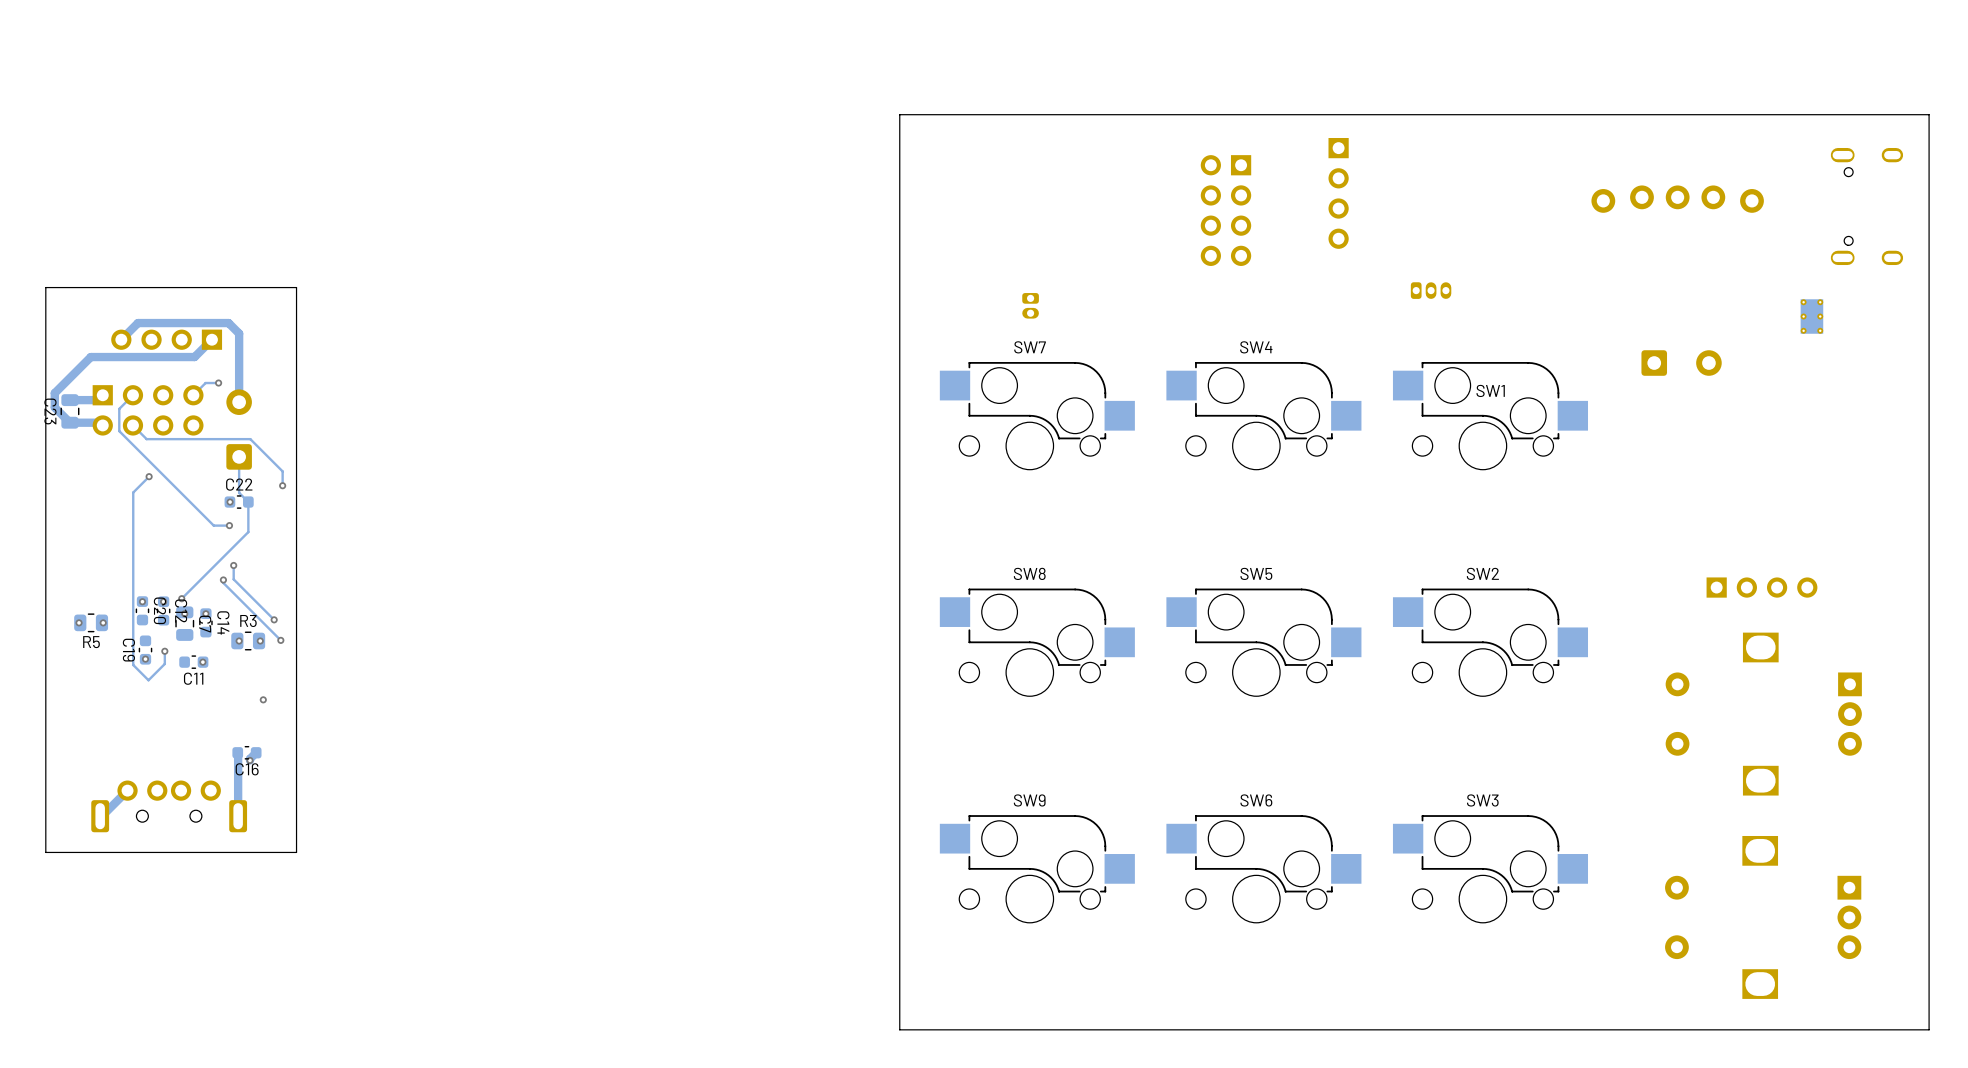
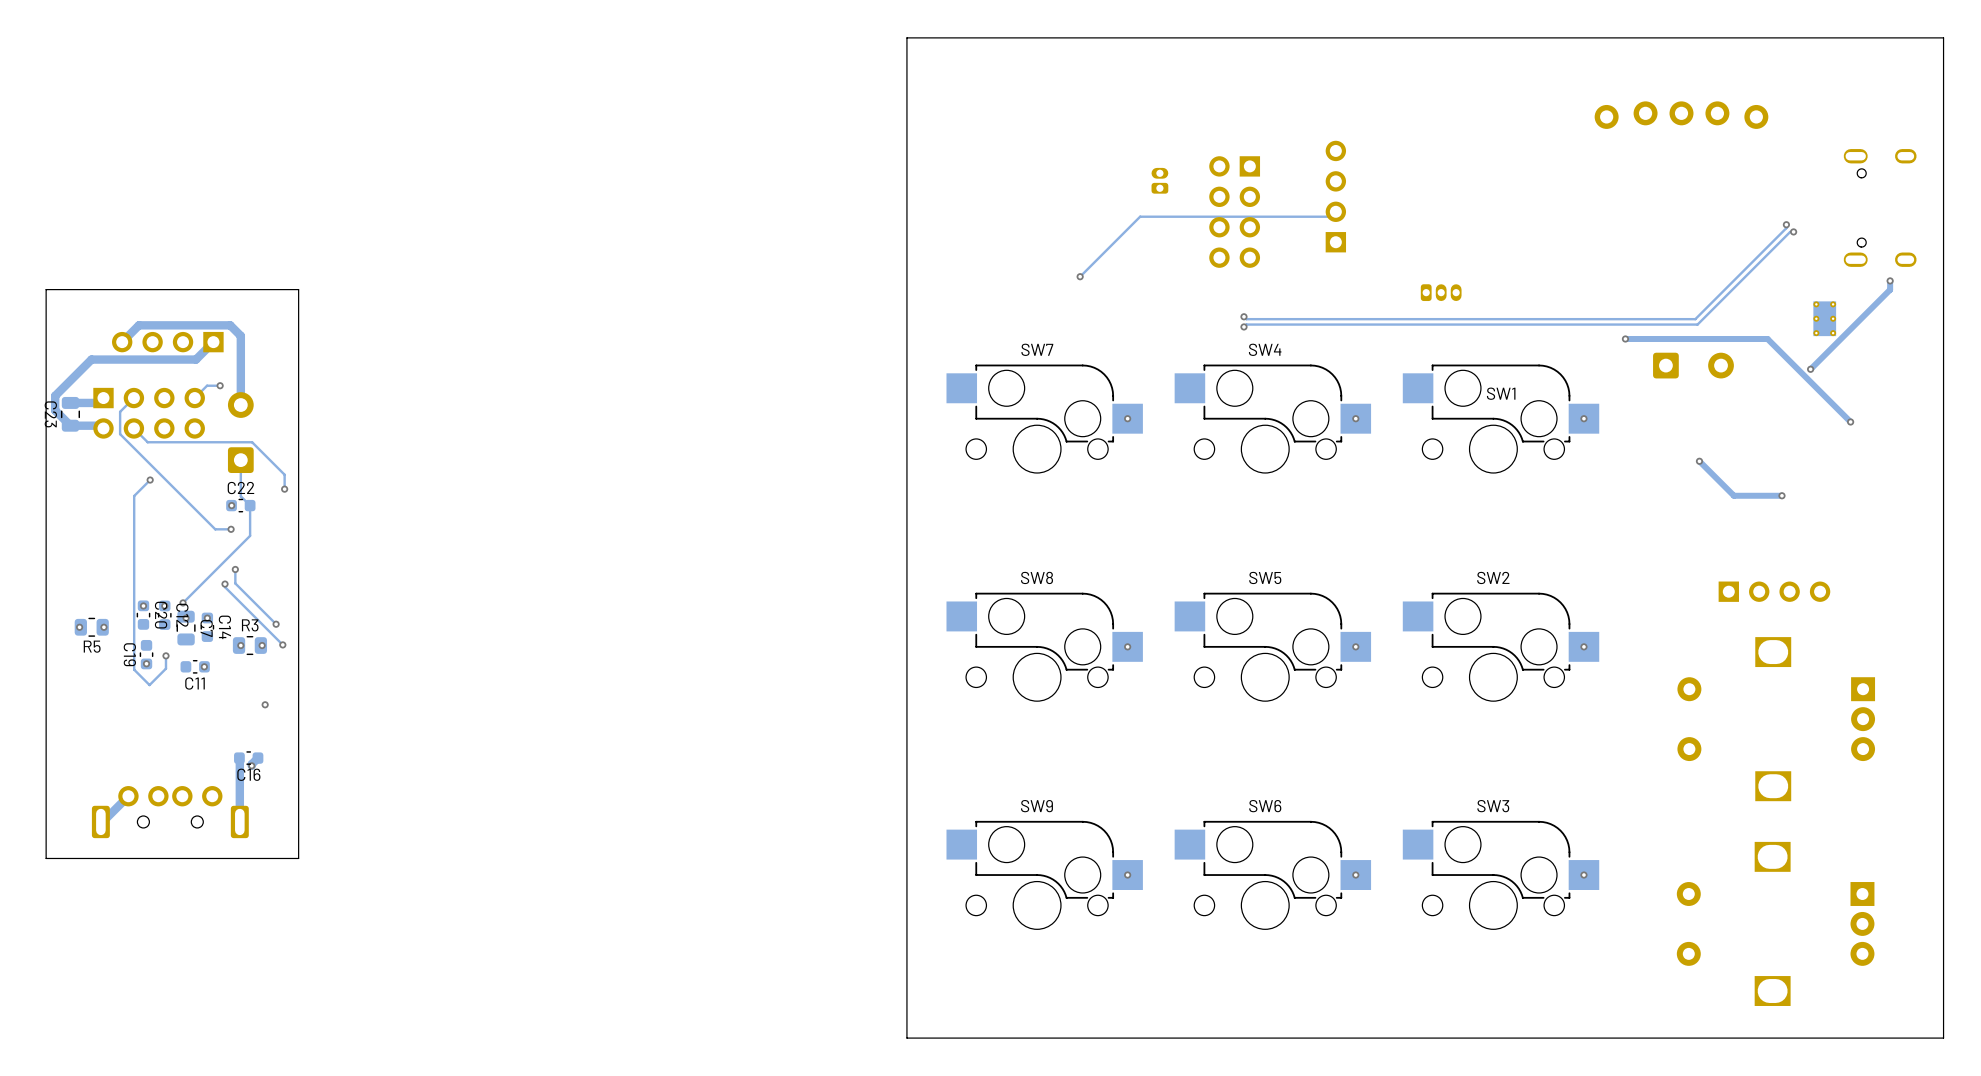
board edge: (1929, 114) (899, 114) (899, 1029) (1929, 1029) (1929, 114) -> (1943, 37) (1943, 1038) (906, 1038) (906, 37) (1943, 37)
part rotation: 0° (1338, 193) -> 180° (1335, 196)
part position: (1677, 199) -> (1681, 115)
track: none -> (1335, 211) (1330, 216) (1140, 216) (1080, 276)
track: none -> (1786, 224) (1786, 228) (1695, 319) (1246, 319) (1243, 316)
via: none -> (1786, 224)
track: none -> (1793, 231) (1790, 231) (1697, 324) (1246, 324) (1243, 326)
via: none -> (1793, 231)
via: none -> (1080, 276)
track: none -> (1890, 280) (1890, 289) (1810, 369)
via: none -> (1890, 280)
part rotation: 0° (1030, 305) -> 180° (1159, 180)
part position: (1030, 305) -> (1159, 180)
via: none -> (1243, 316)
via: none -> (1243, 326)
track: none -> (1625, 338) (1767, 338) (1850, 421)
via: none -> (1625, 338)
via: none -> (1810, 369)
via: none -> (1127, 418)
via: none -> (1355, 418)
via: none -> (1583, 418)
via: none -> (1850, 421)
track: none -> (1699, 461) (1733, 495) (1781, 495)
via: none -> (1699, 461)
via: none -> (1781, 495)
via: none -> (1127, 646)
via: none -> (1355, 646)
via: none -> (1583, 646)
via: none -> (1127, 875)
via: none -> (1355, 875)
via: none -> (1583, 875)

